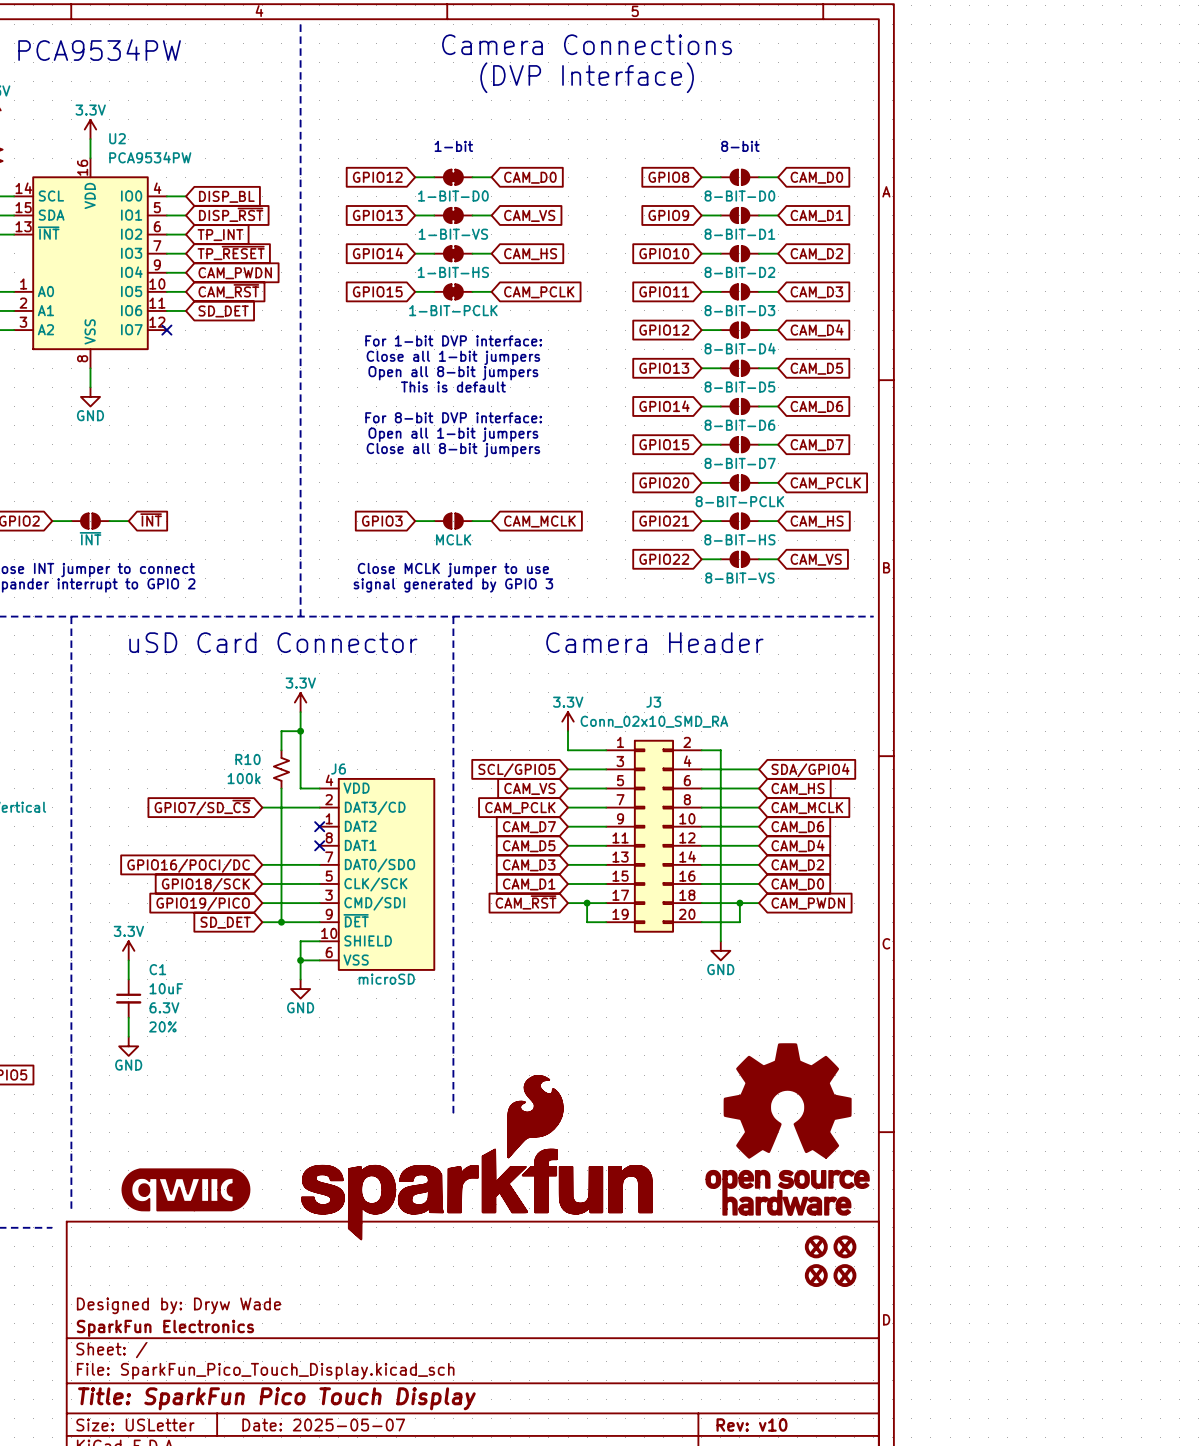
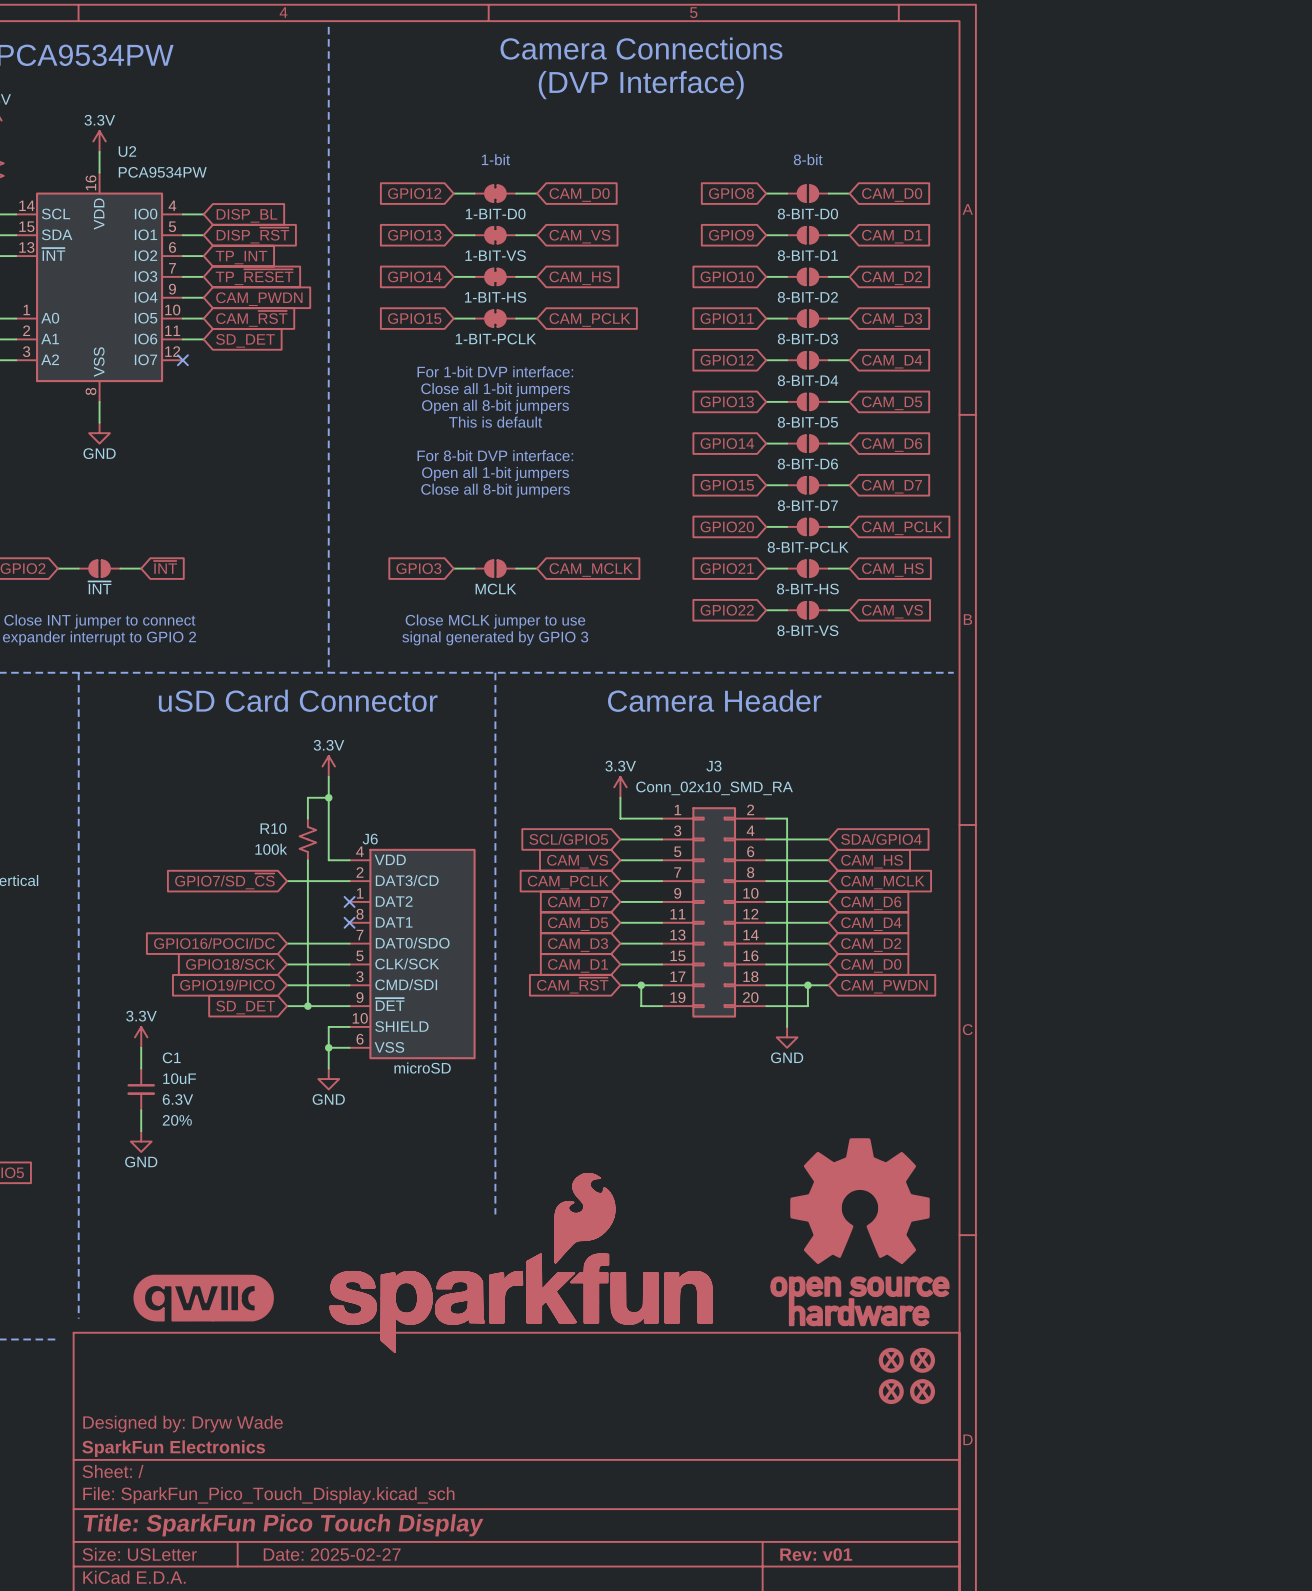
title block: Date: 2025-05-07 (323, 1425) -> Date: 2025-02-27 (332, 1554)
title block: Rev: v10 (751, 1425) -> Rev: v01 (816, 1554)

